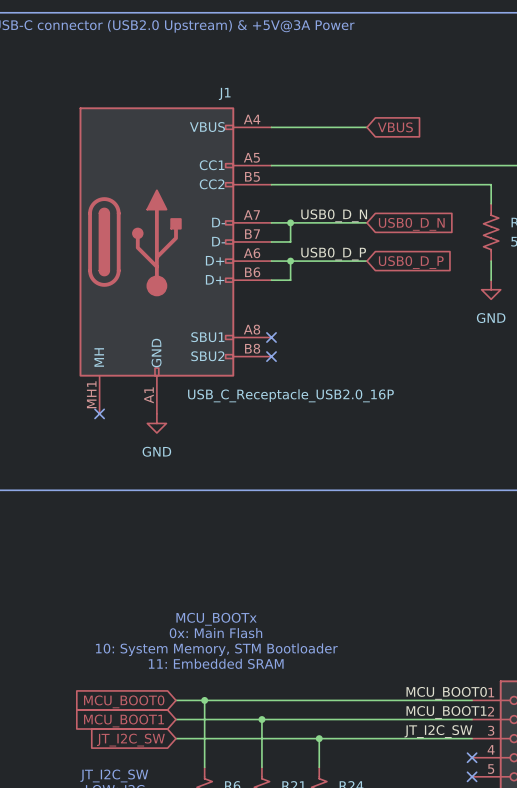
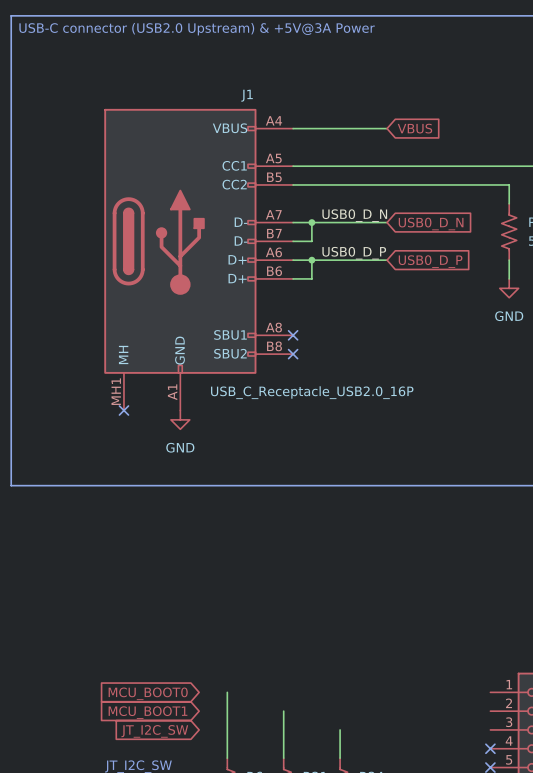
text: MCU_BOOTx (216, 619) -> none
text: 0x: Main Flash (215, 633) -> none
text: 10: System Memory, STM Bootloader (216, 649) -> none
text: 11: Embedded SRAM (216, 663) -> none
label: MCU_BOOT0 (446, 693) -> none
wire: (175, 700) (472, 700) -> none
junction: (204, 700) -> none
label: MCU_BOOT1 (446, 712) -> none
wire: (175, 719) (472, 719) -> none
junction: (261, 719) -> none
label: JT_I2C_SW (438, 731) -> none
wire: (175, 738) (472, 738) -> none
junction: (319, 738) -> none

